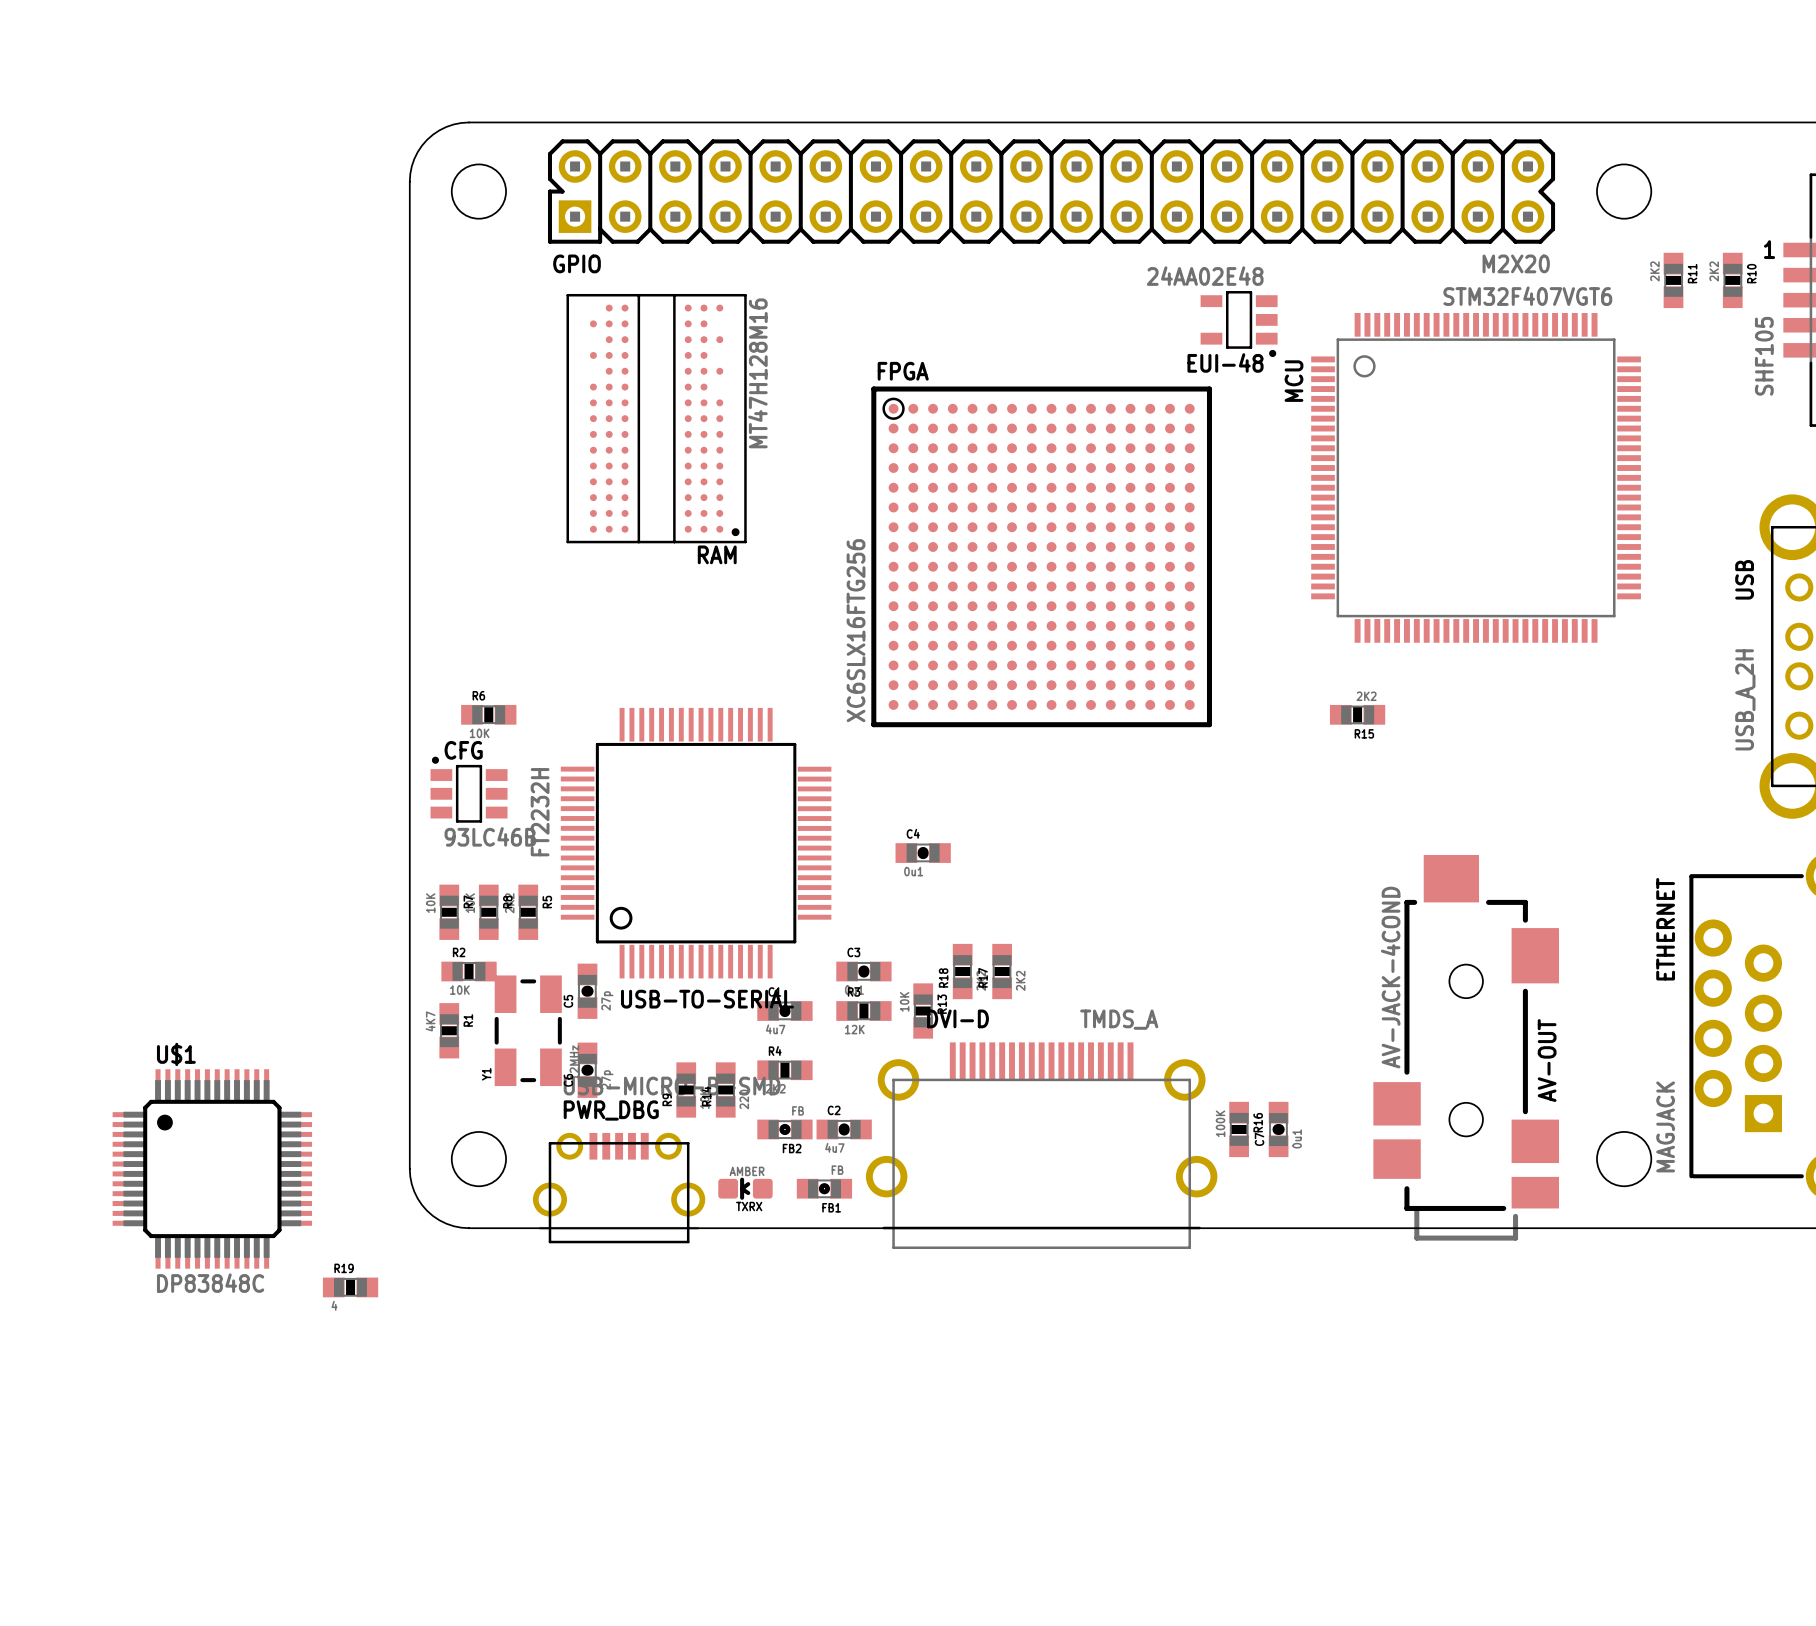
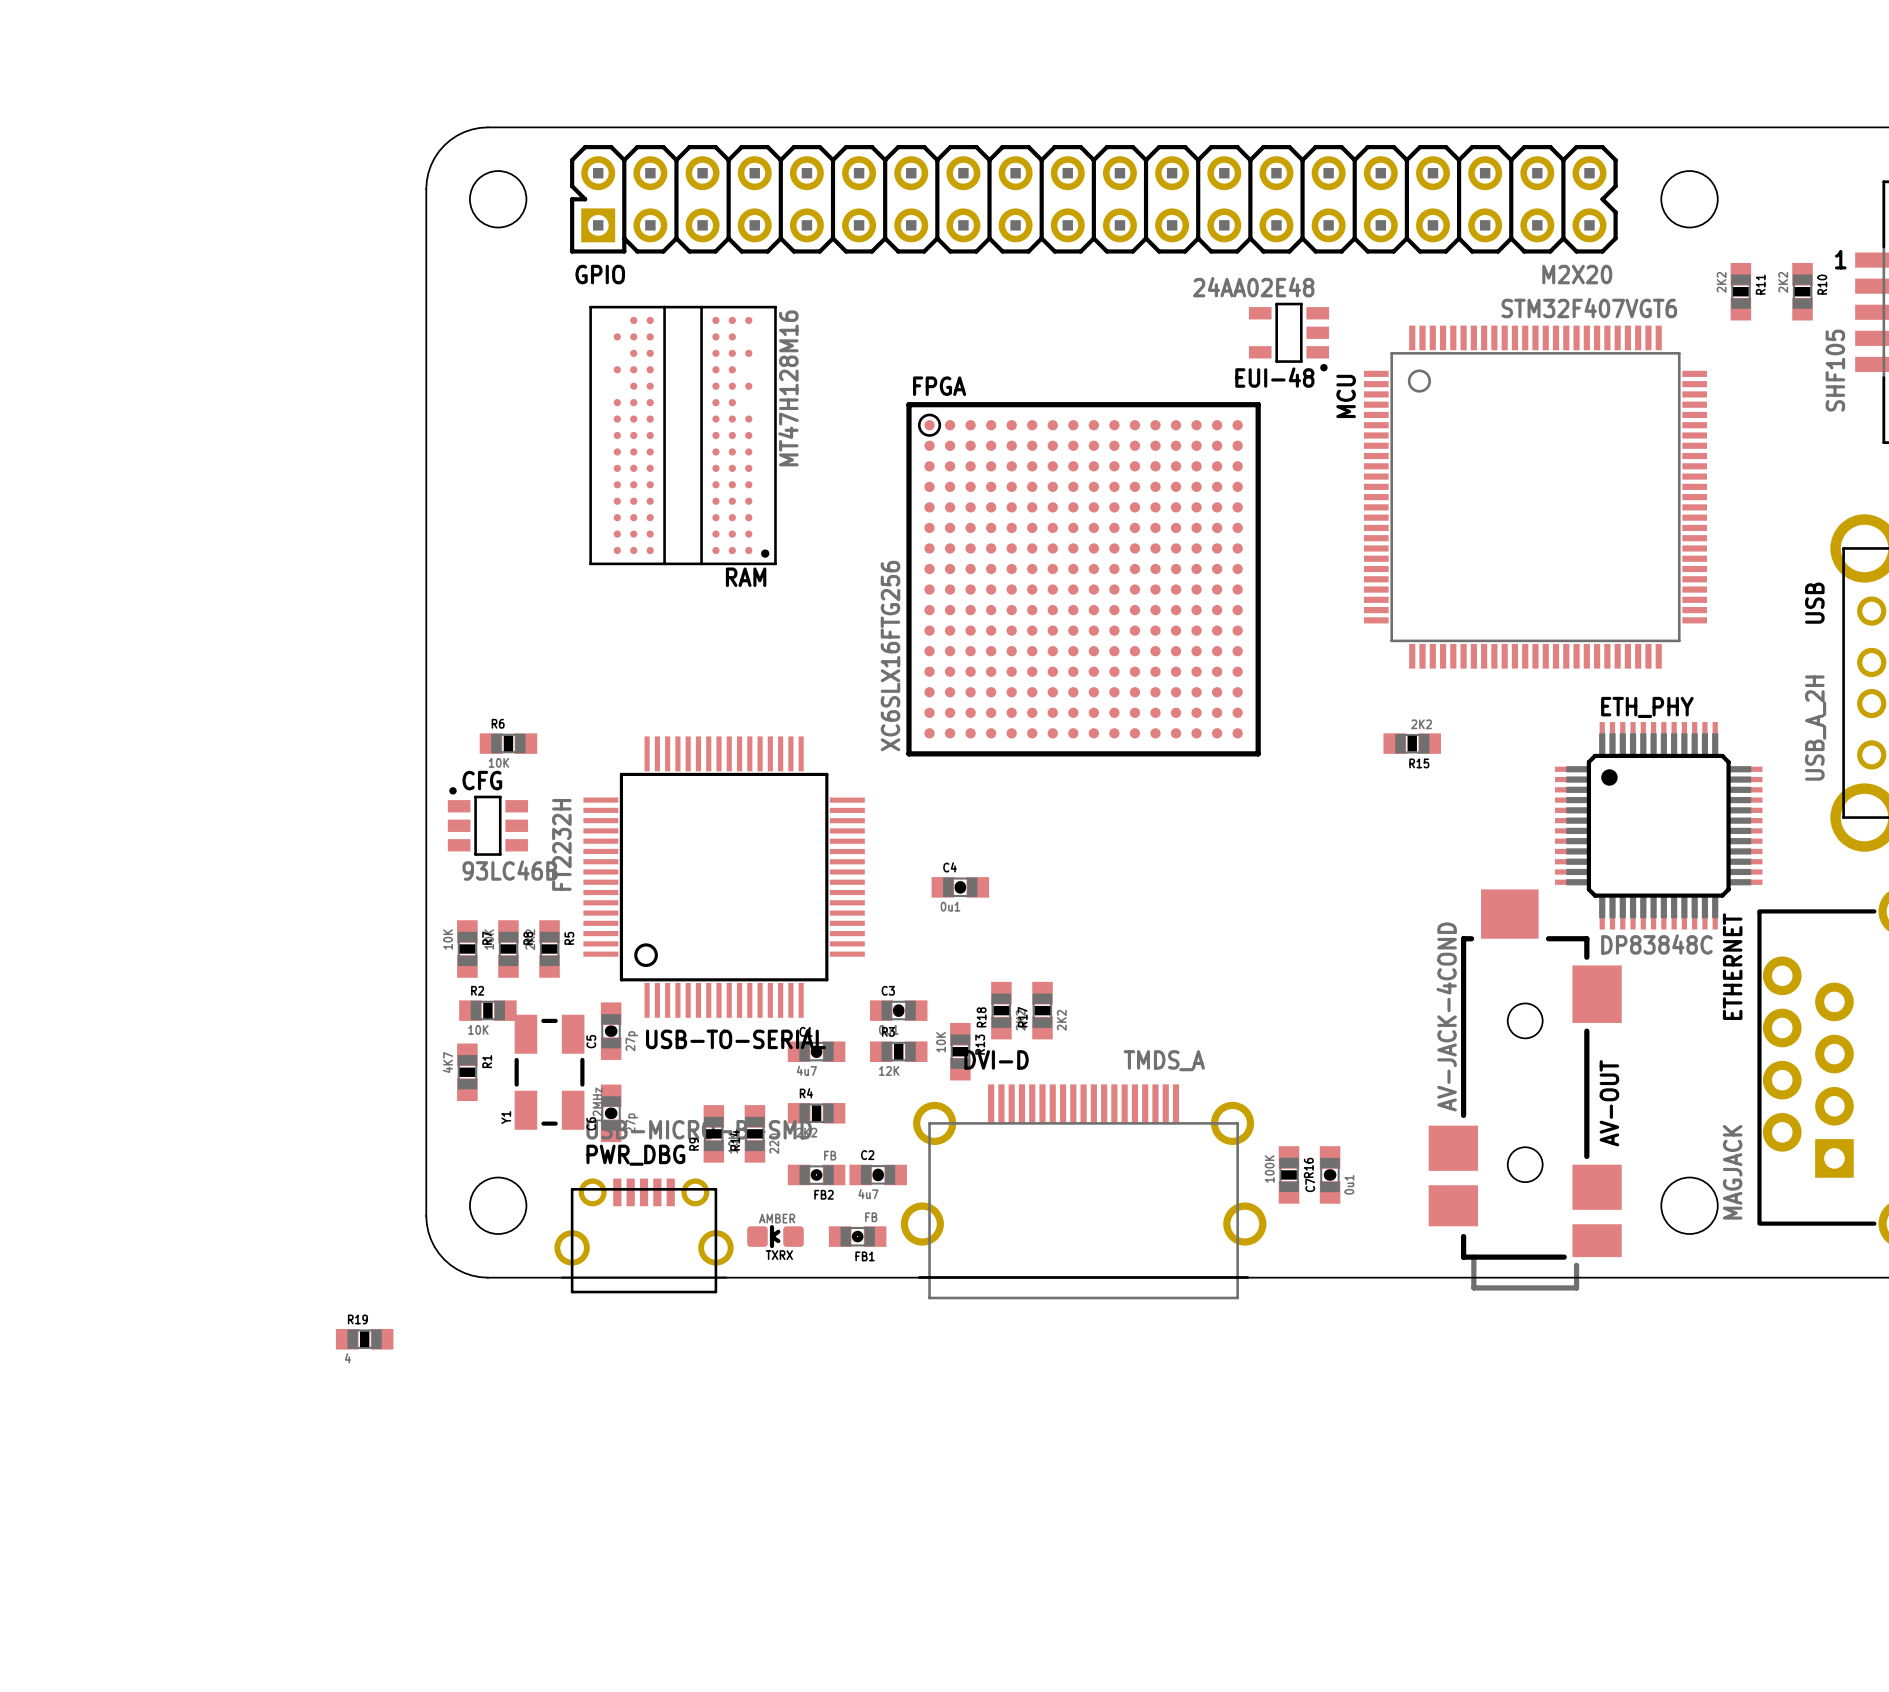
ETH_PHY: none -> DP83848C (1658, 825)
U$1: DP83848C (212, 1168) -> none

